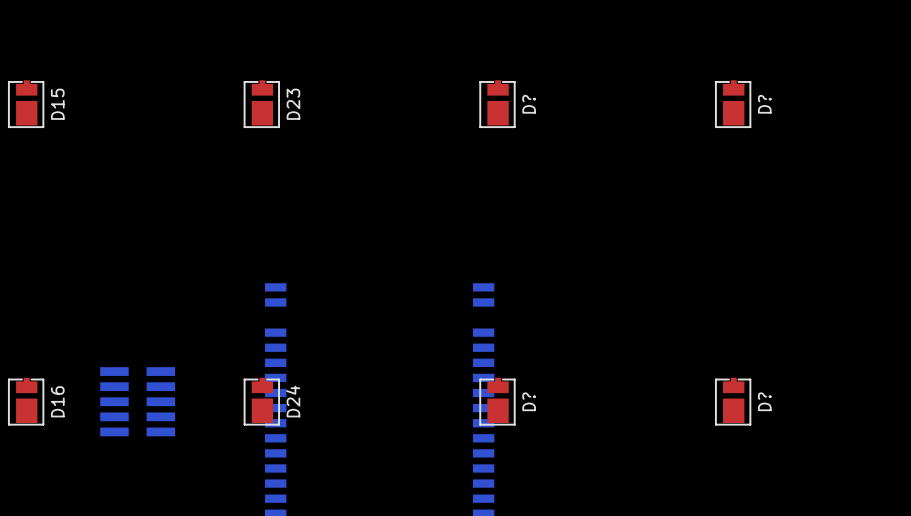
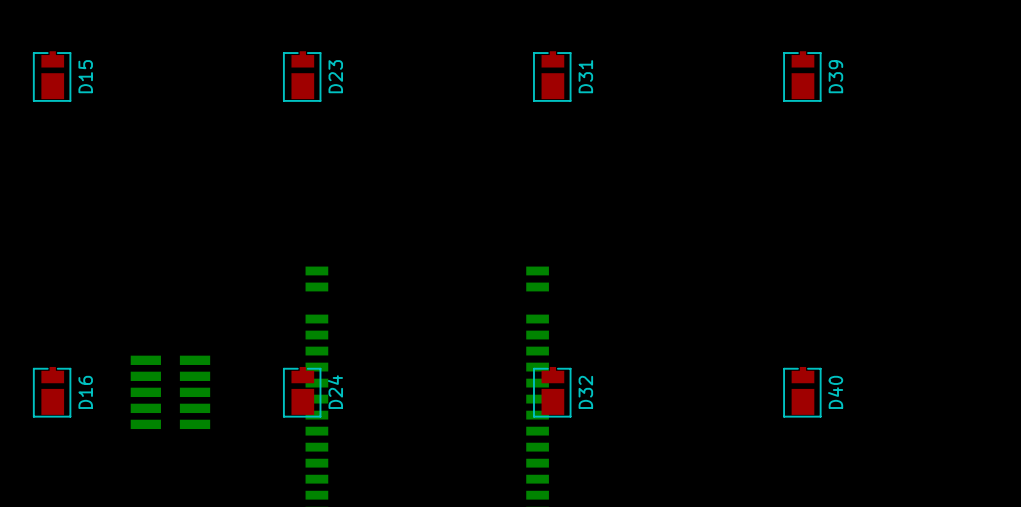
D? name: D? (529, 104) -> D31 (585, 76)
D? name: D? (764, 104) -> D39 (835, 76)
D? name: D? (529, 401) -> D32 (585, 392)
D? name: D? (764, 401) -> D40 (835, 392)

